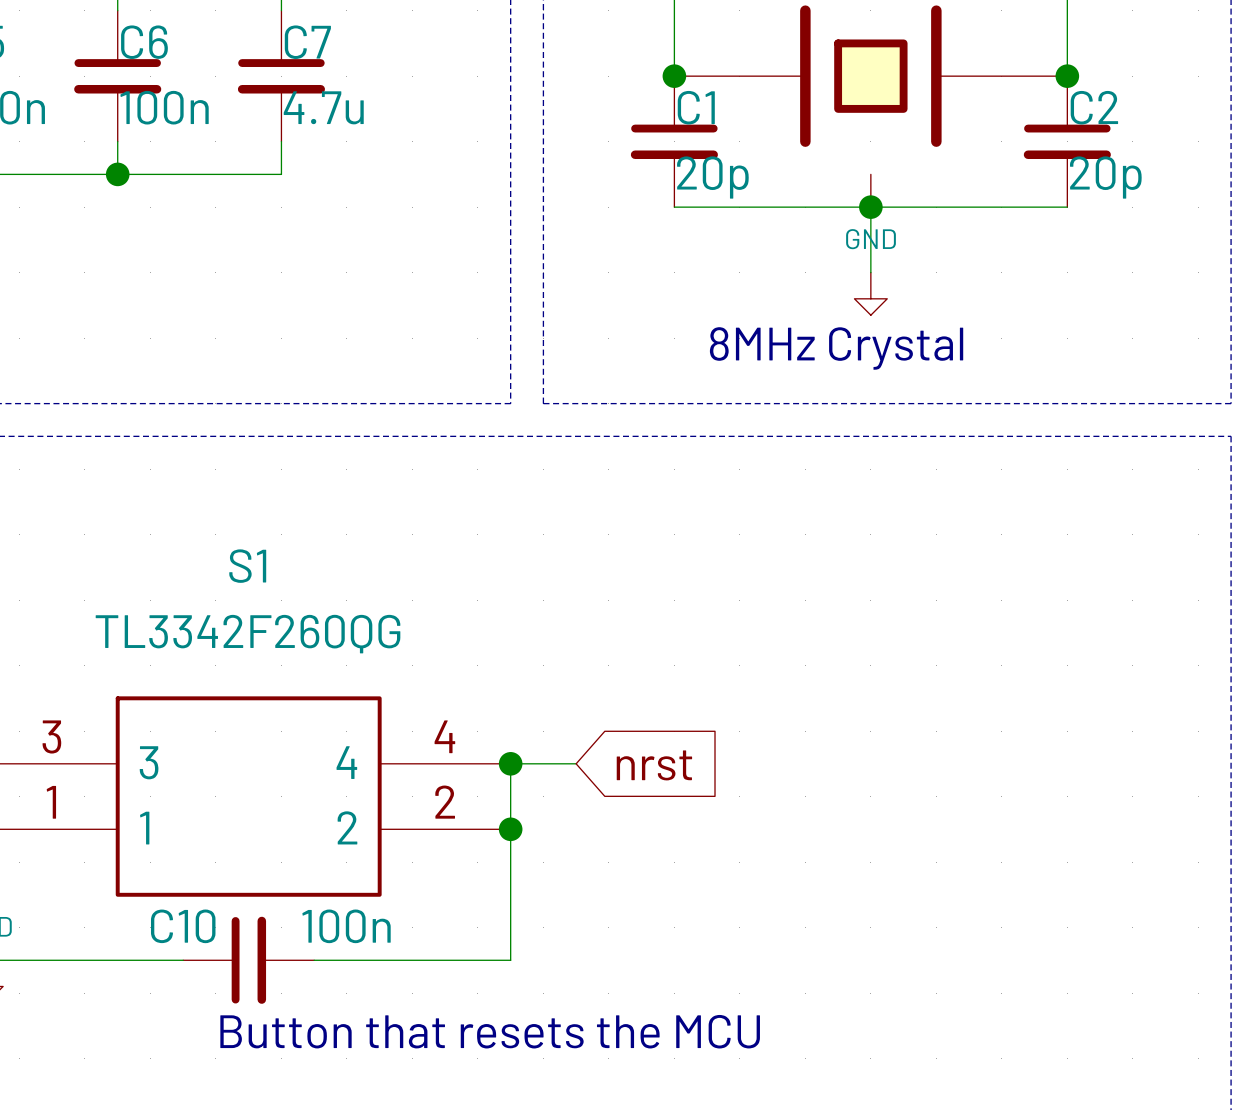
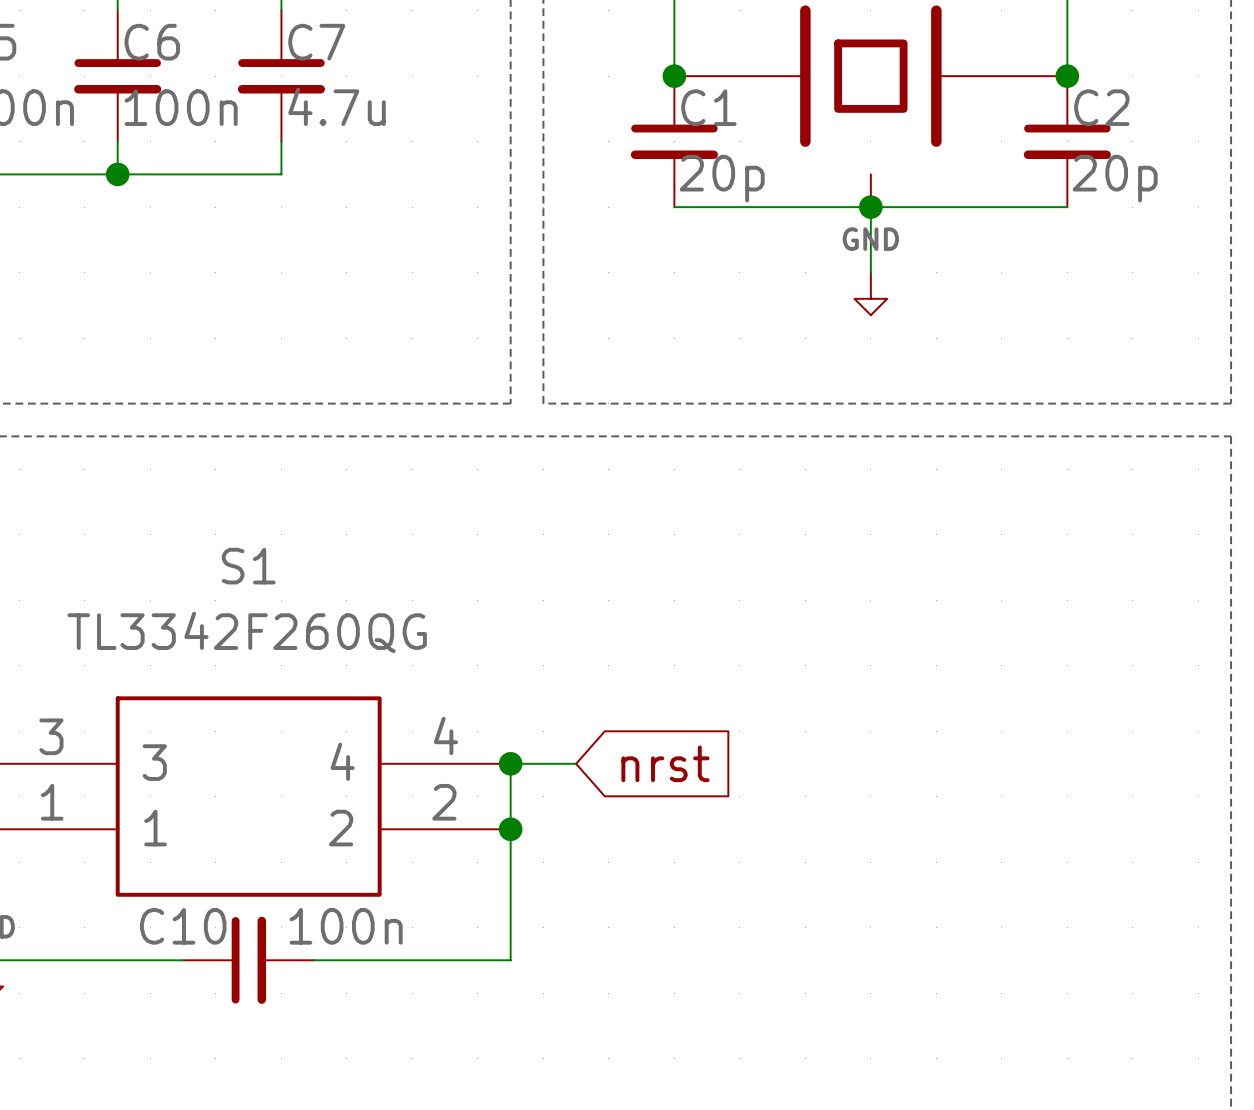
text: 8MHz Crystal (836, 348) -> none
text: Button that resets the MCU (490, 1031) -> none

